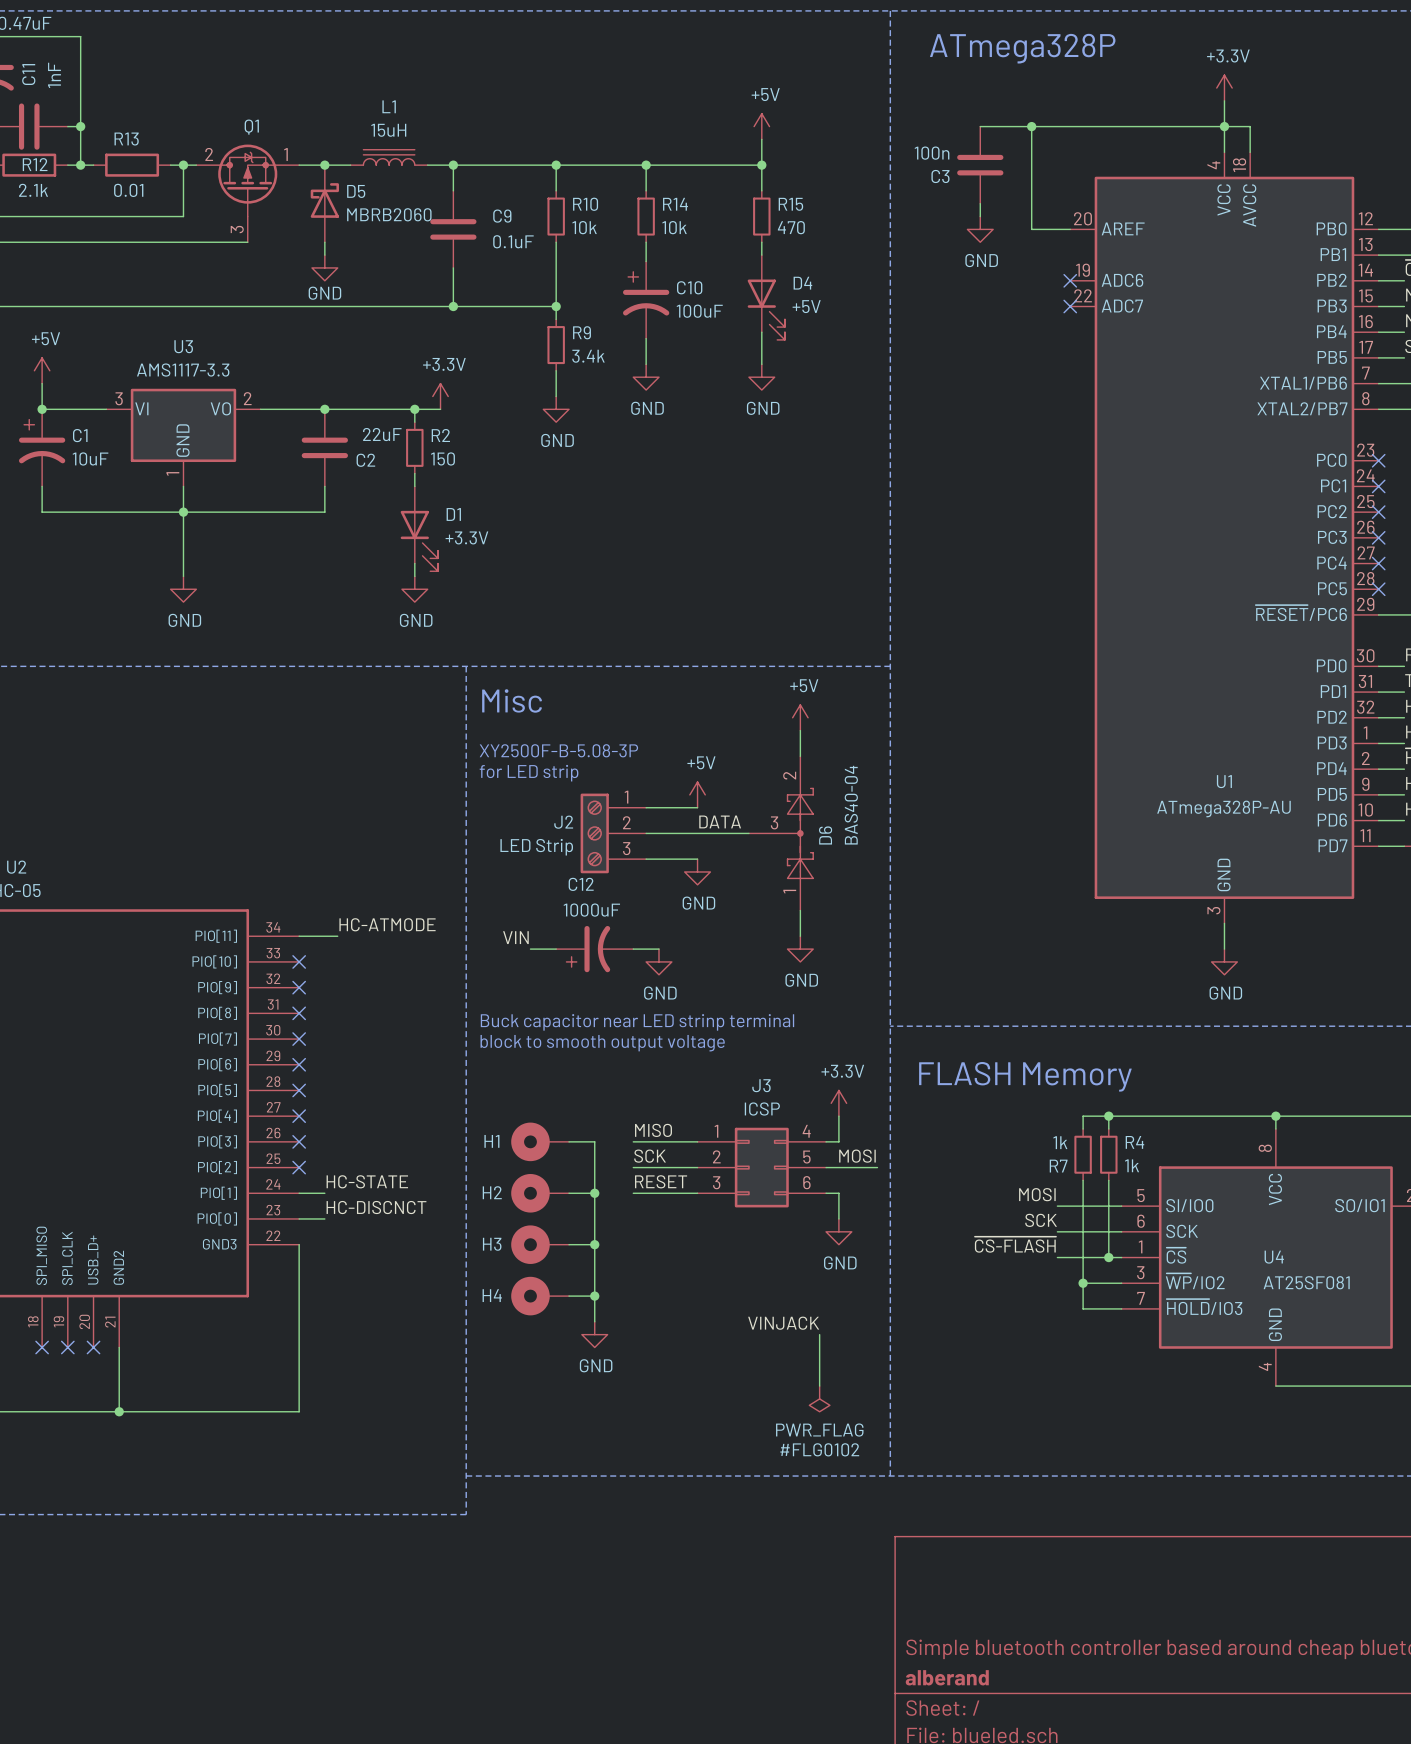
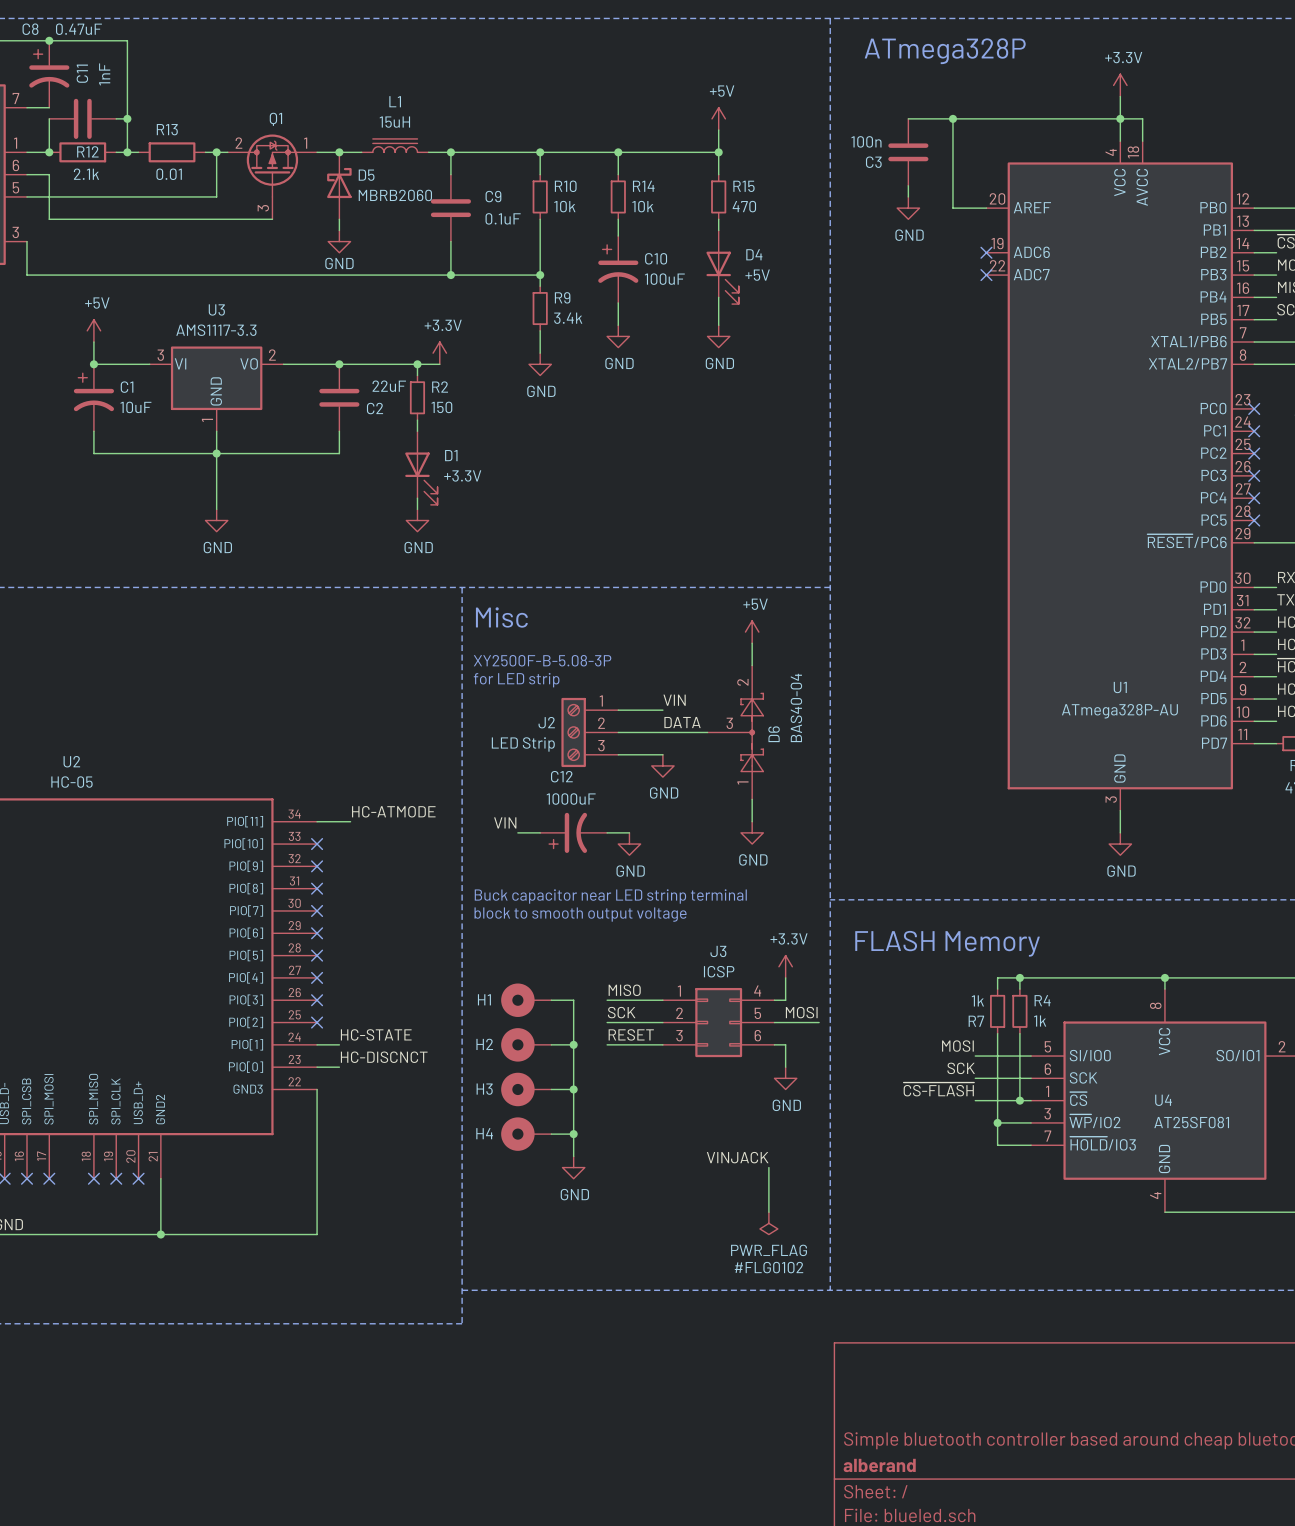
power symbol: +5V (697, 794) -> none
label: none -> VIN (674, 700)

